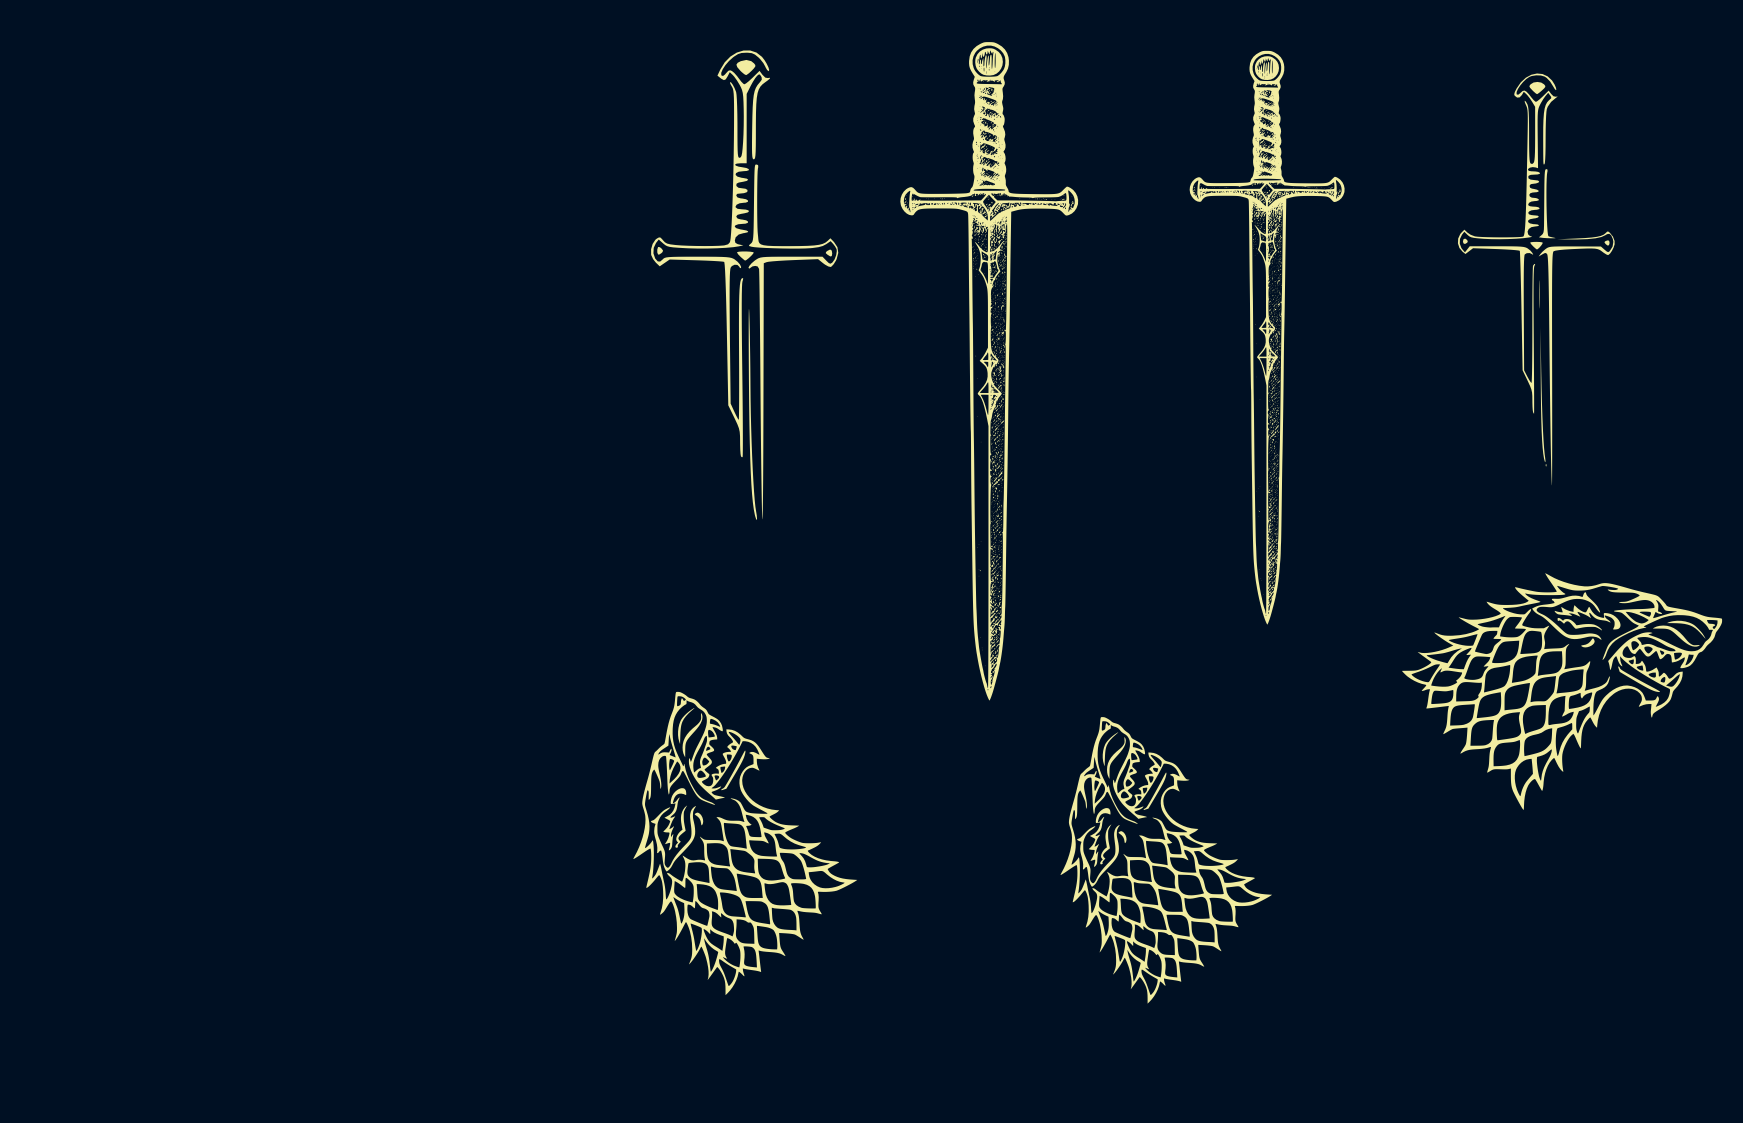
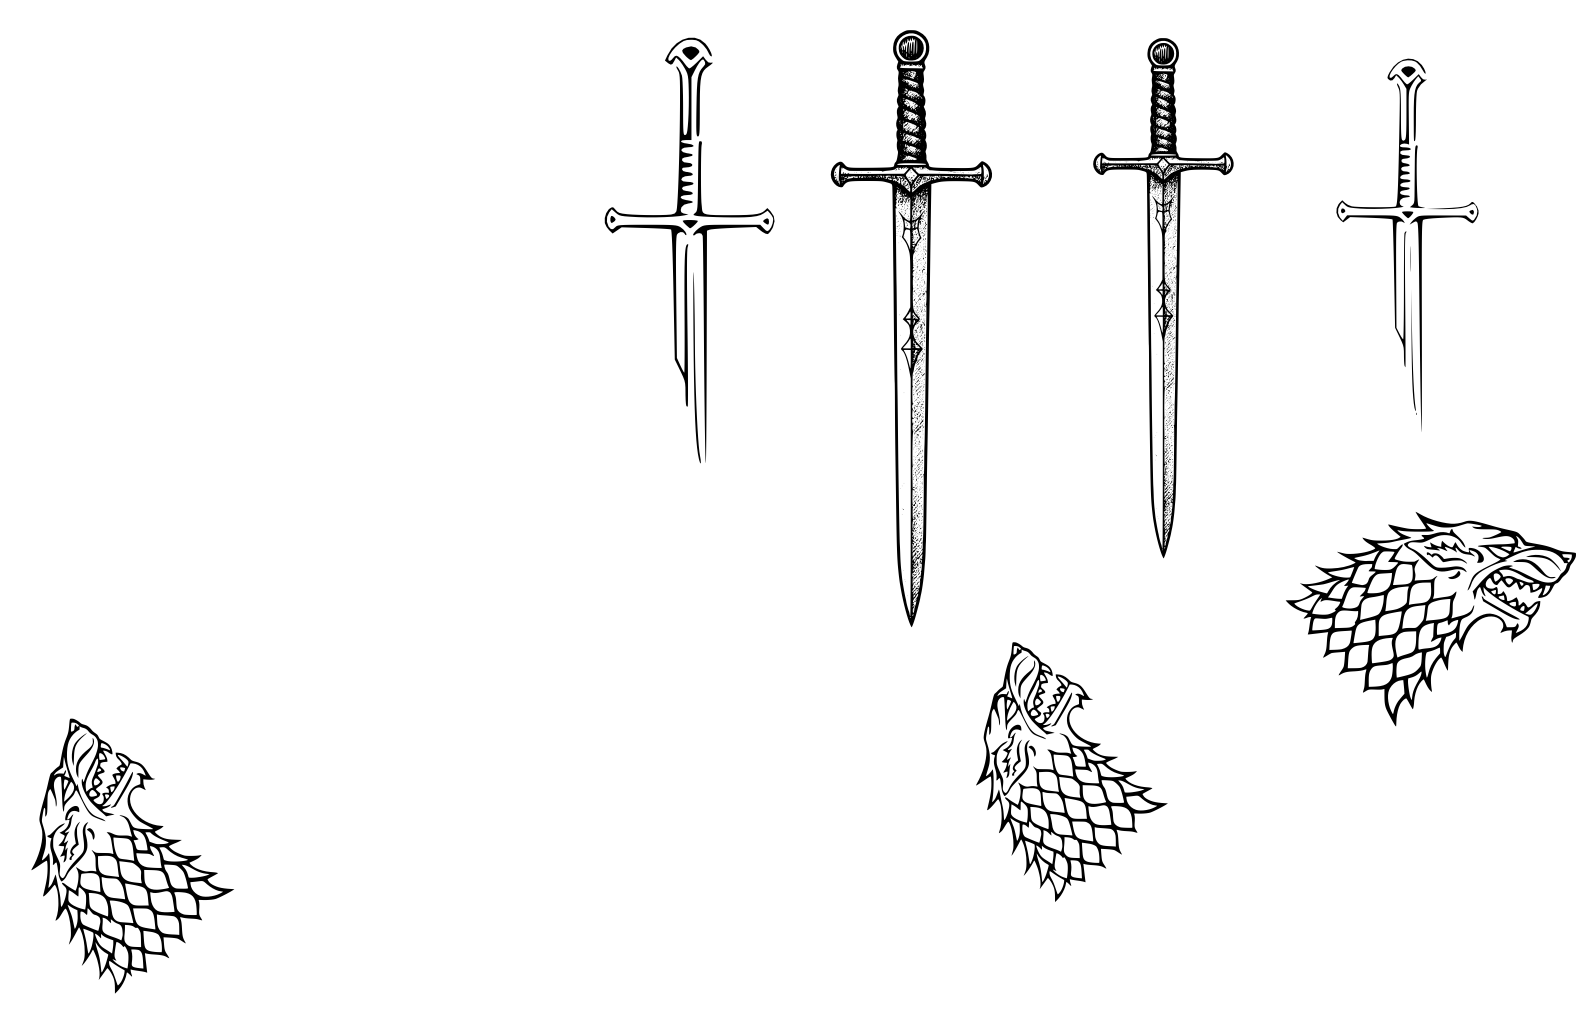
drawing: [633, 691, 858, 996] -> none
drawing: none -> [31, 718, 235, 994]

